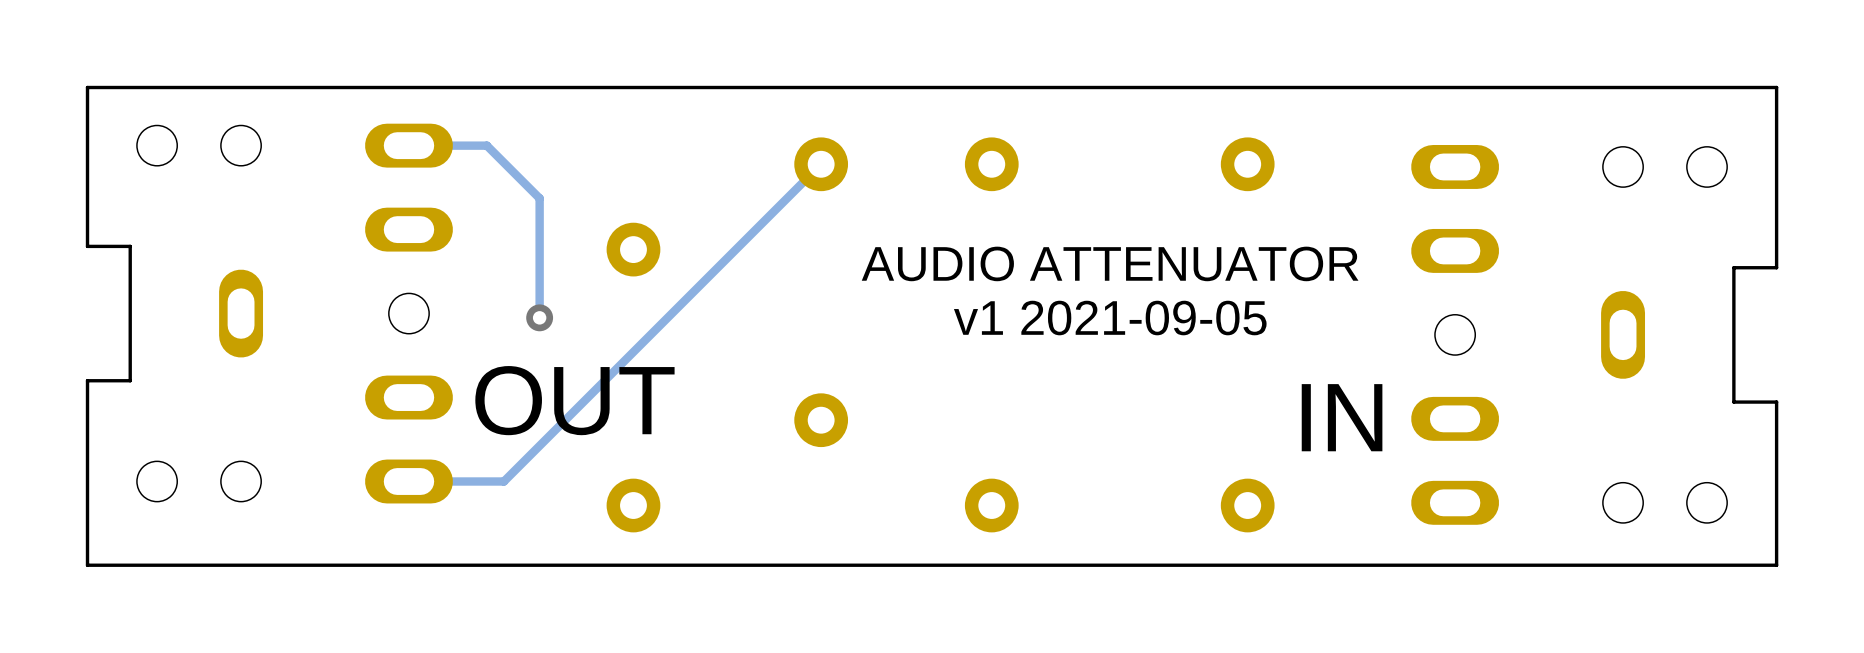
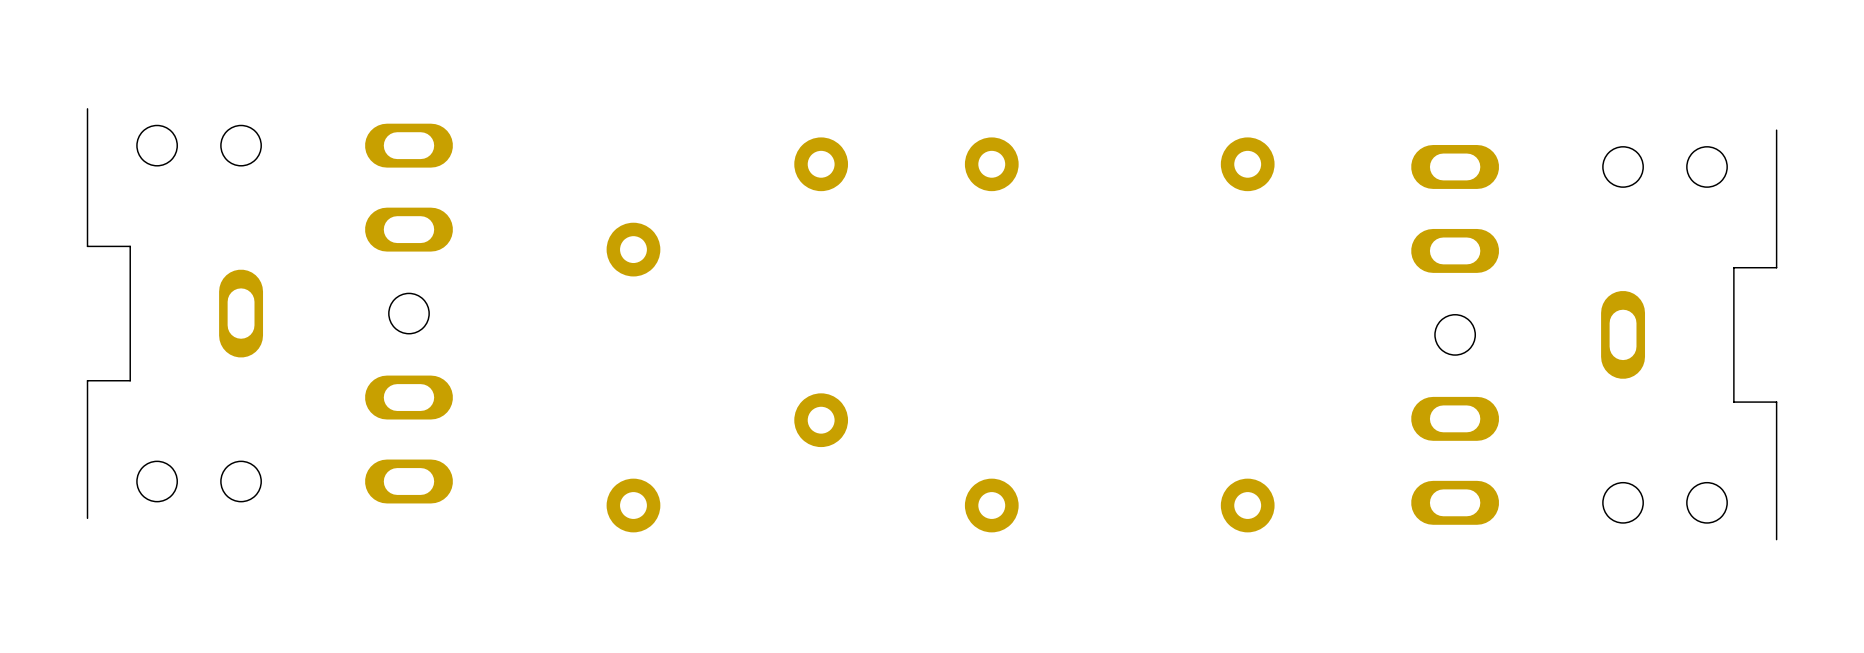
board edge: (1776, 87) (87, 87) (87, 246) (130, 246) (130, 380) (87, 380) (87, 565) (1776, 565) (1776, 402) (1733, 402) (1733, 267) (1776, 267) (1776, 87) -> none
track: (408, 145) (486, 145) (539, 198) (539, 317) -> none
track: (821, 164) (503, 481) (408, 481) -> none
text: AUDIO ATTENUATOR (1110, 263) -> none
via: (539, 317) -> none
text: v1 2021-09-05 (1110, 318) -> none
text: OUT (574, 400) -> none
text: IN (1342, 417) -> none

